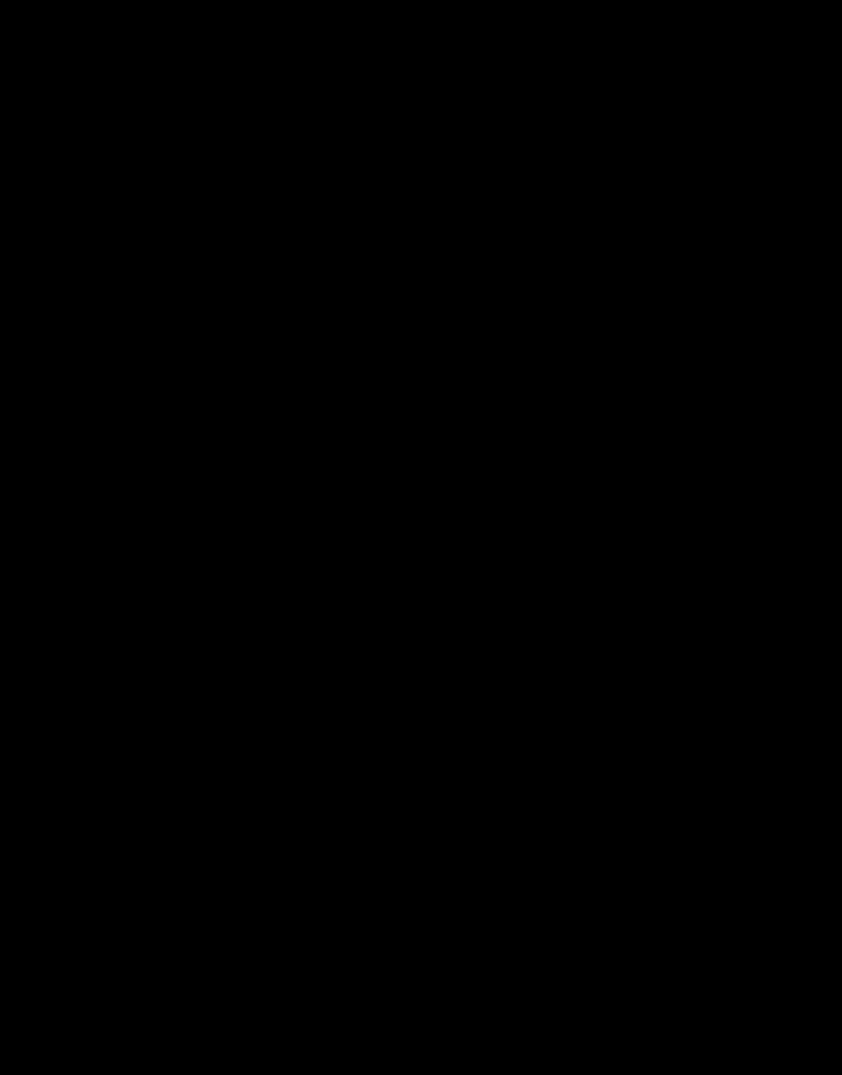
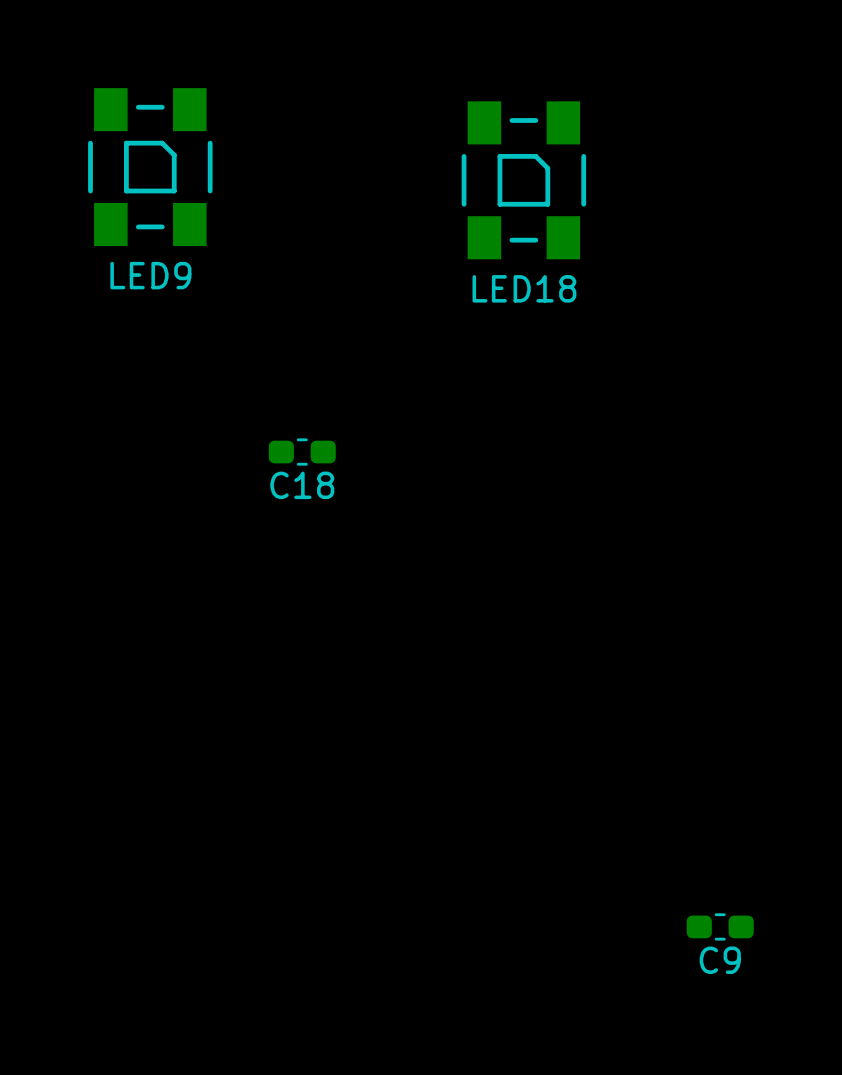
LED9: none -> (150, 167)
LED18: none -> (523, 180)
C18: none -> (302, 452)
C9: none -> (720, 926)

